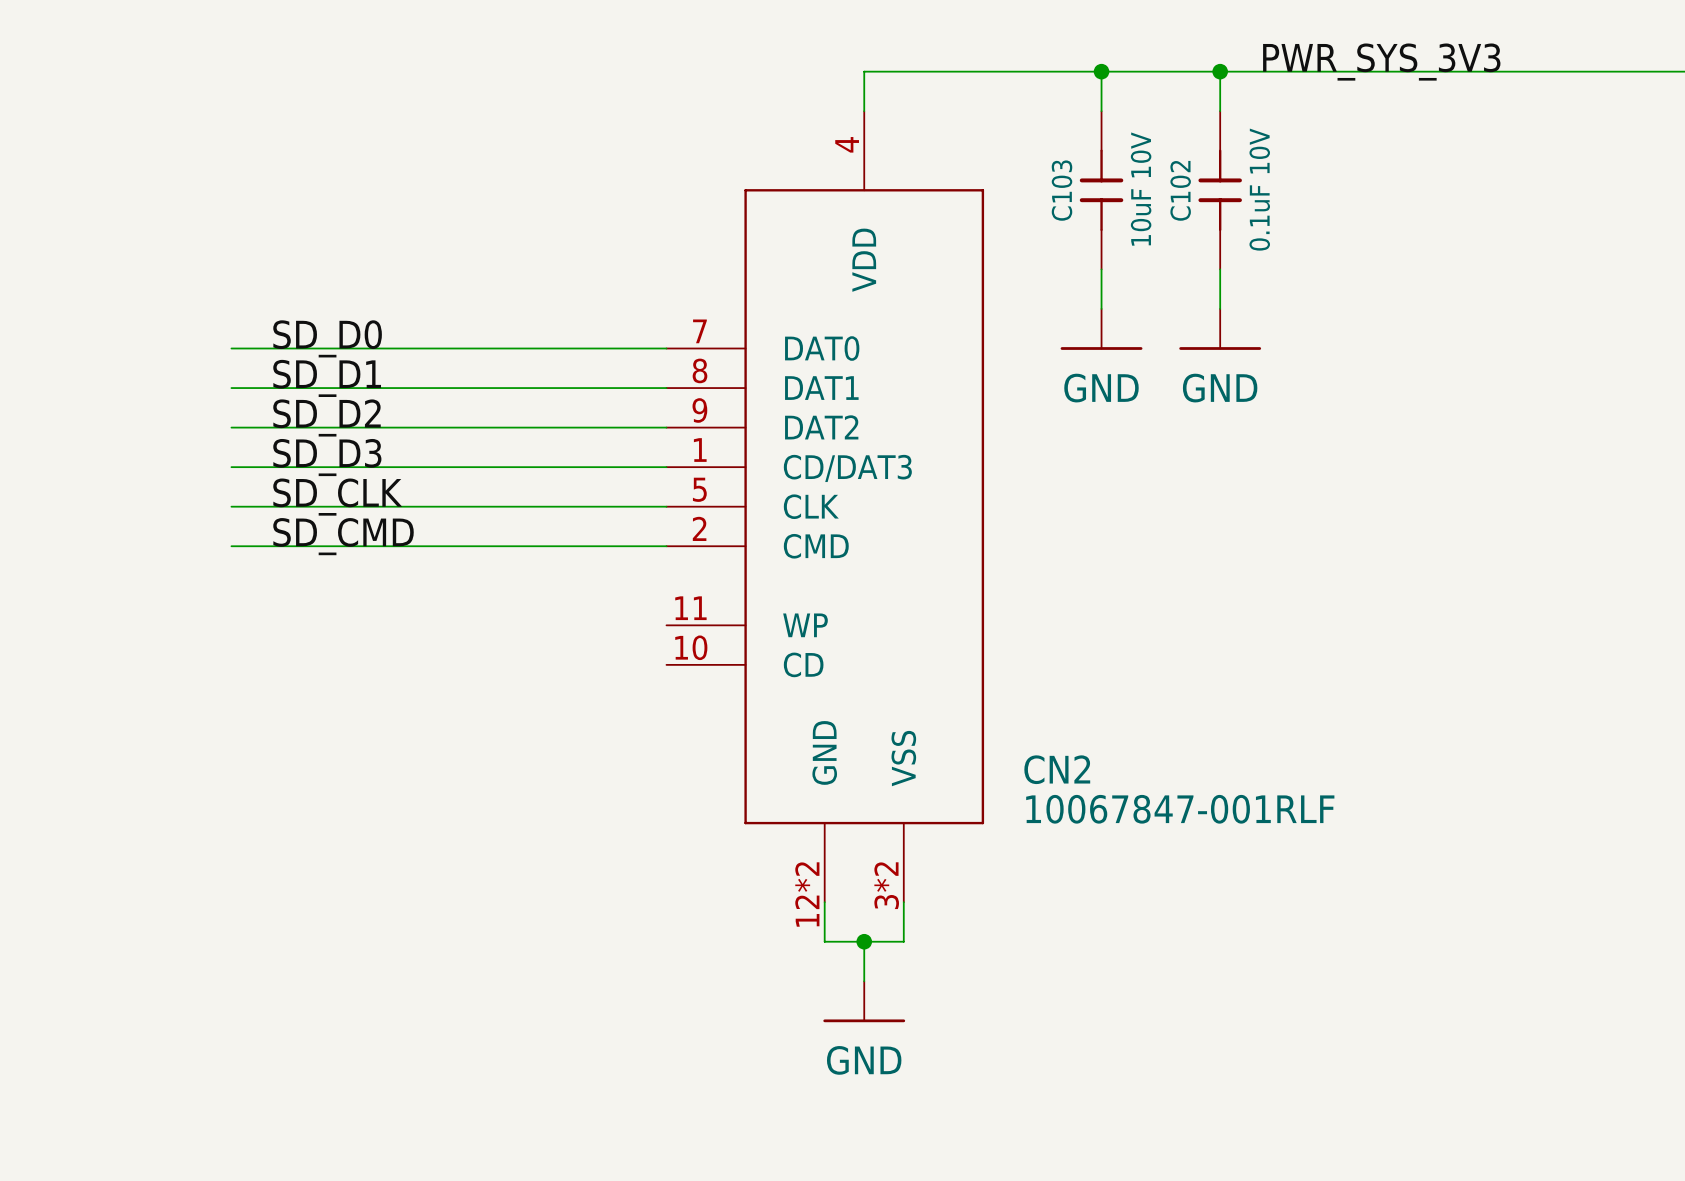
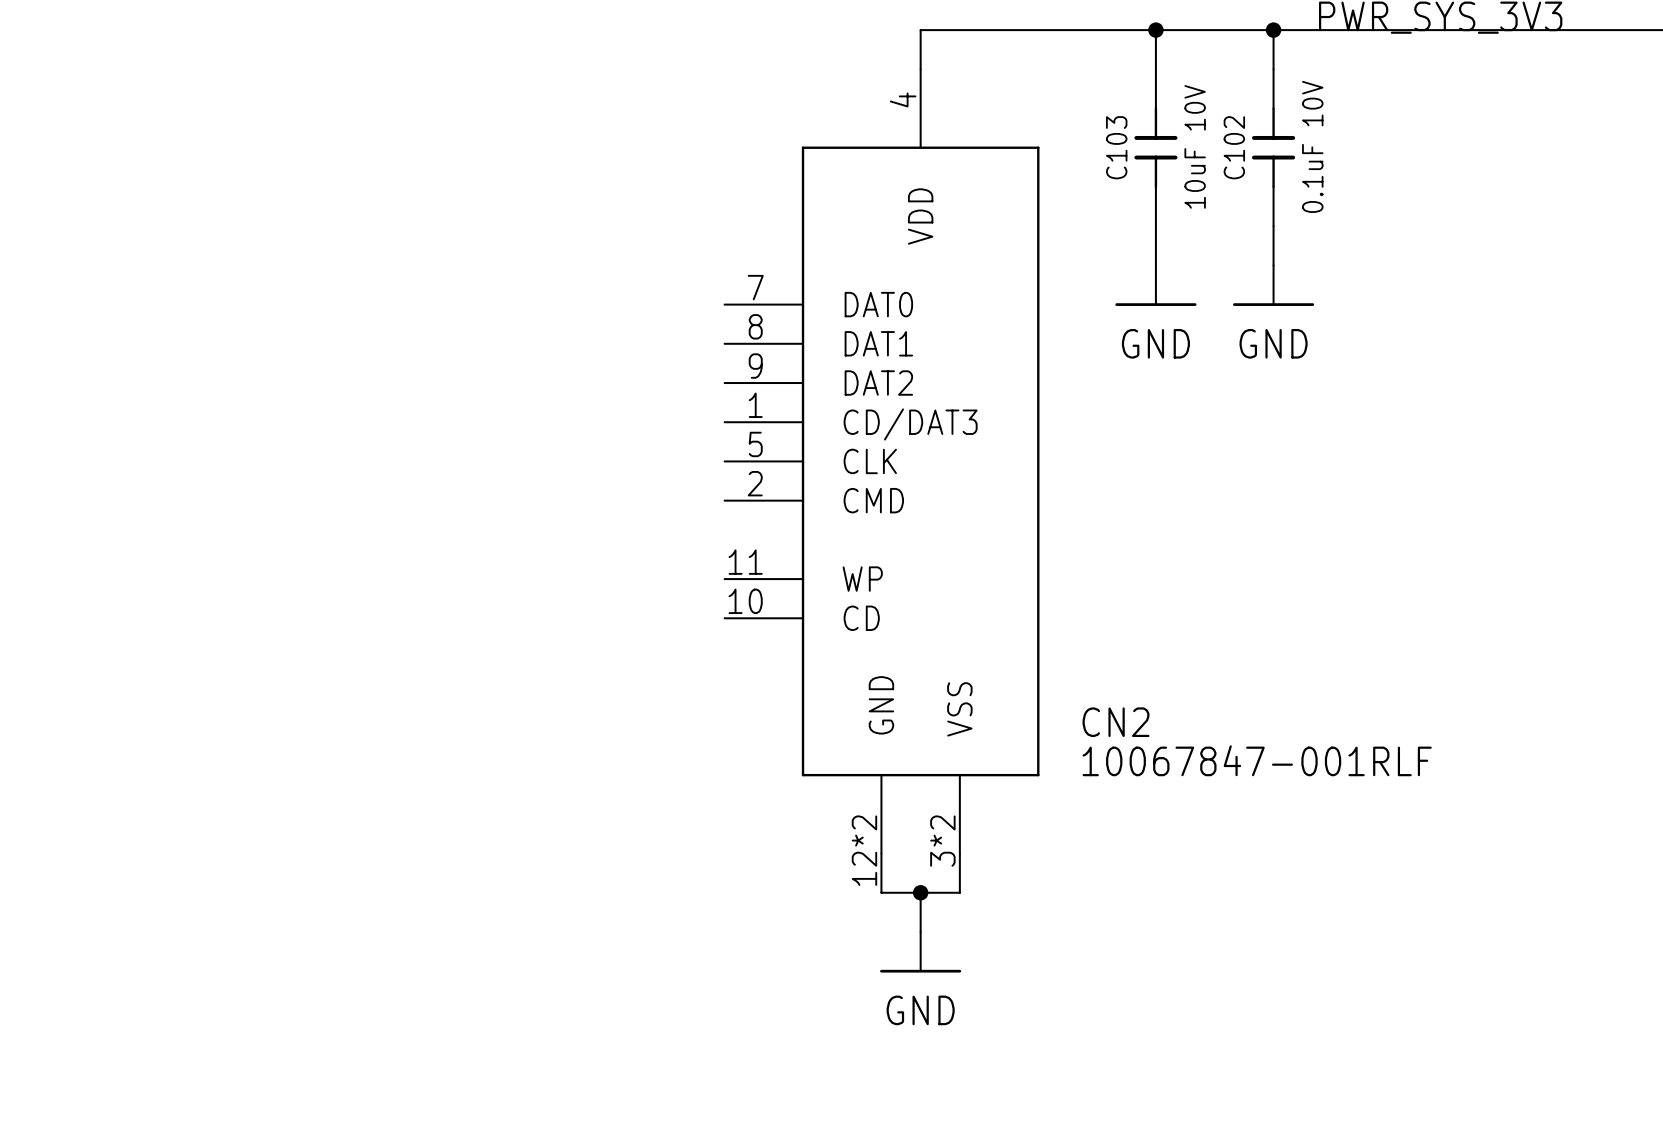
label: SD_D0 (327, 338) -> none
wire: (231, 348) (666, 348) -> none
label: SD_D1 (327, 378) -> none
wire: (231, 388) (666, 388) -> none
label: SD_D2 (327, 417) -> none
wire: (231, 427) (666, 427) -> none
label: SD_D3 (327, 457) -> none
wire: (231, 467) (666, 467) -> none
label: SD_CLK (337, 497) -> none
wire: (231, 506) (666, 506) -> none
label: SD_CMD (343, 536) -> none
wire: (231, 546) (666, 546) -> none

